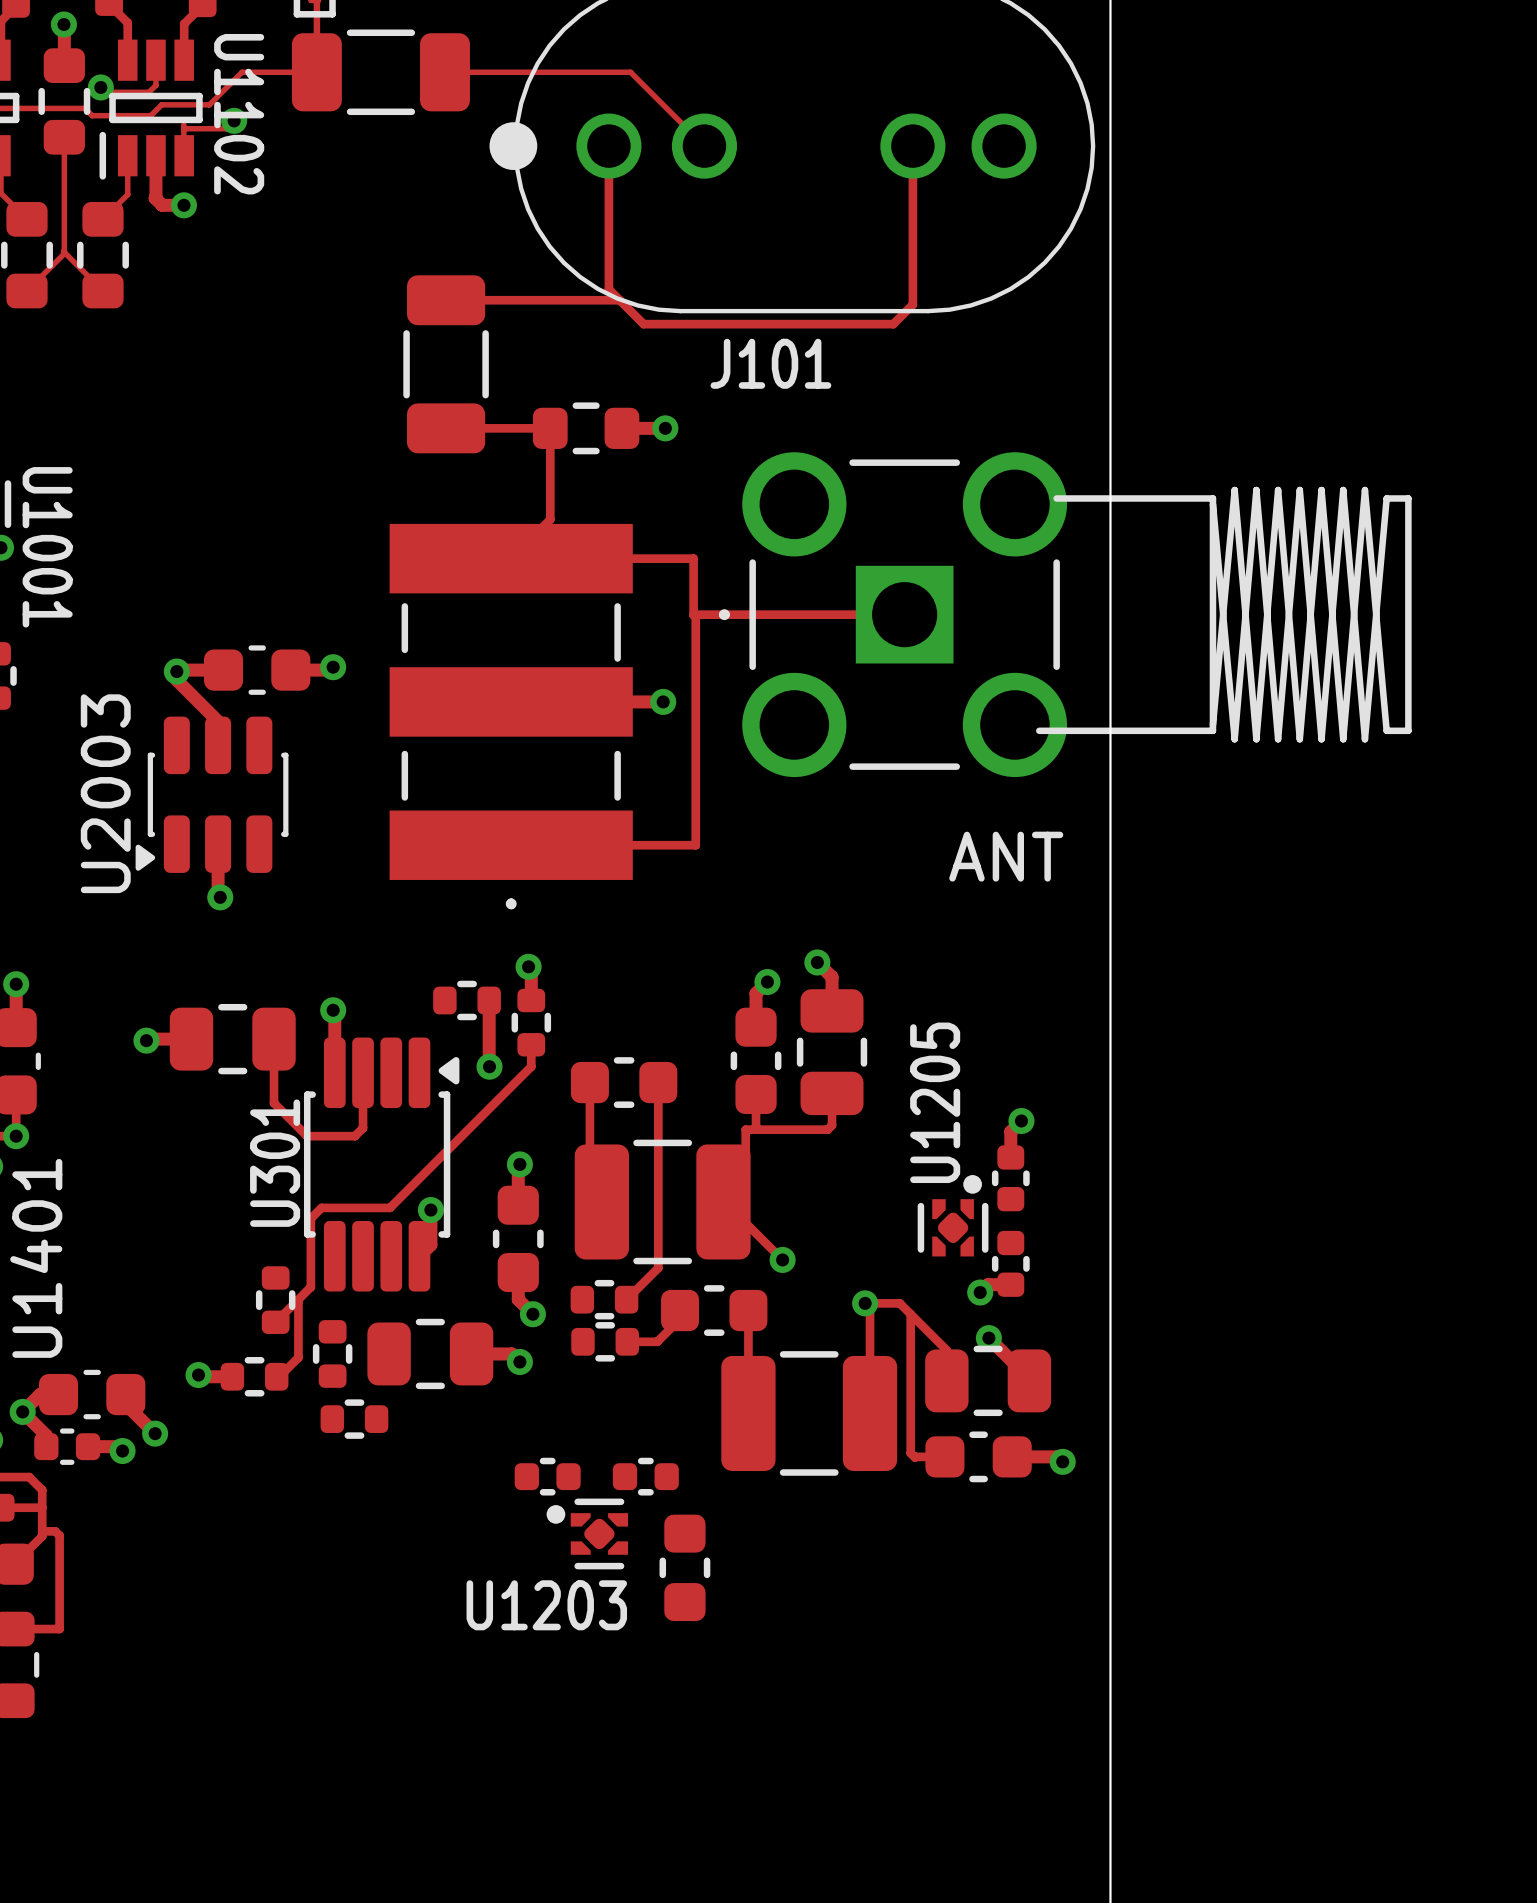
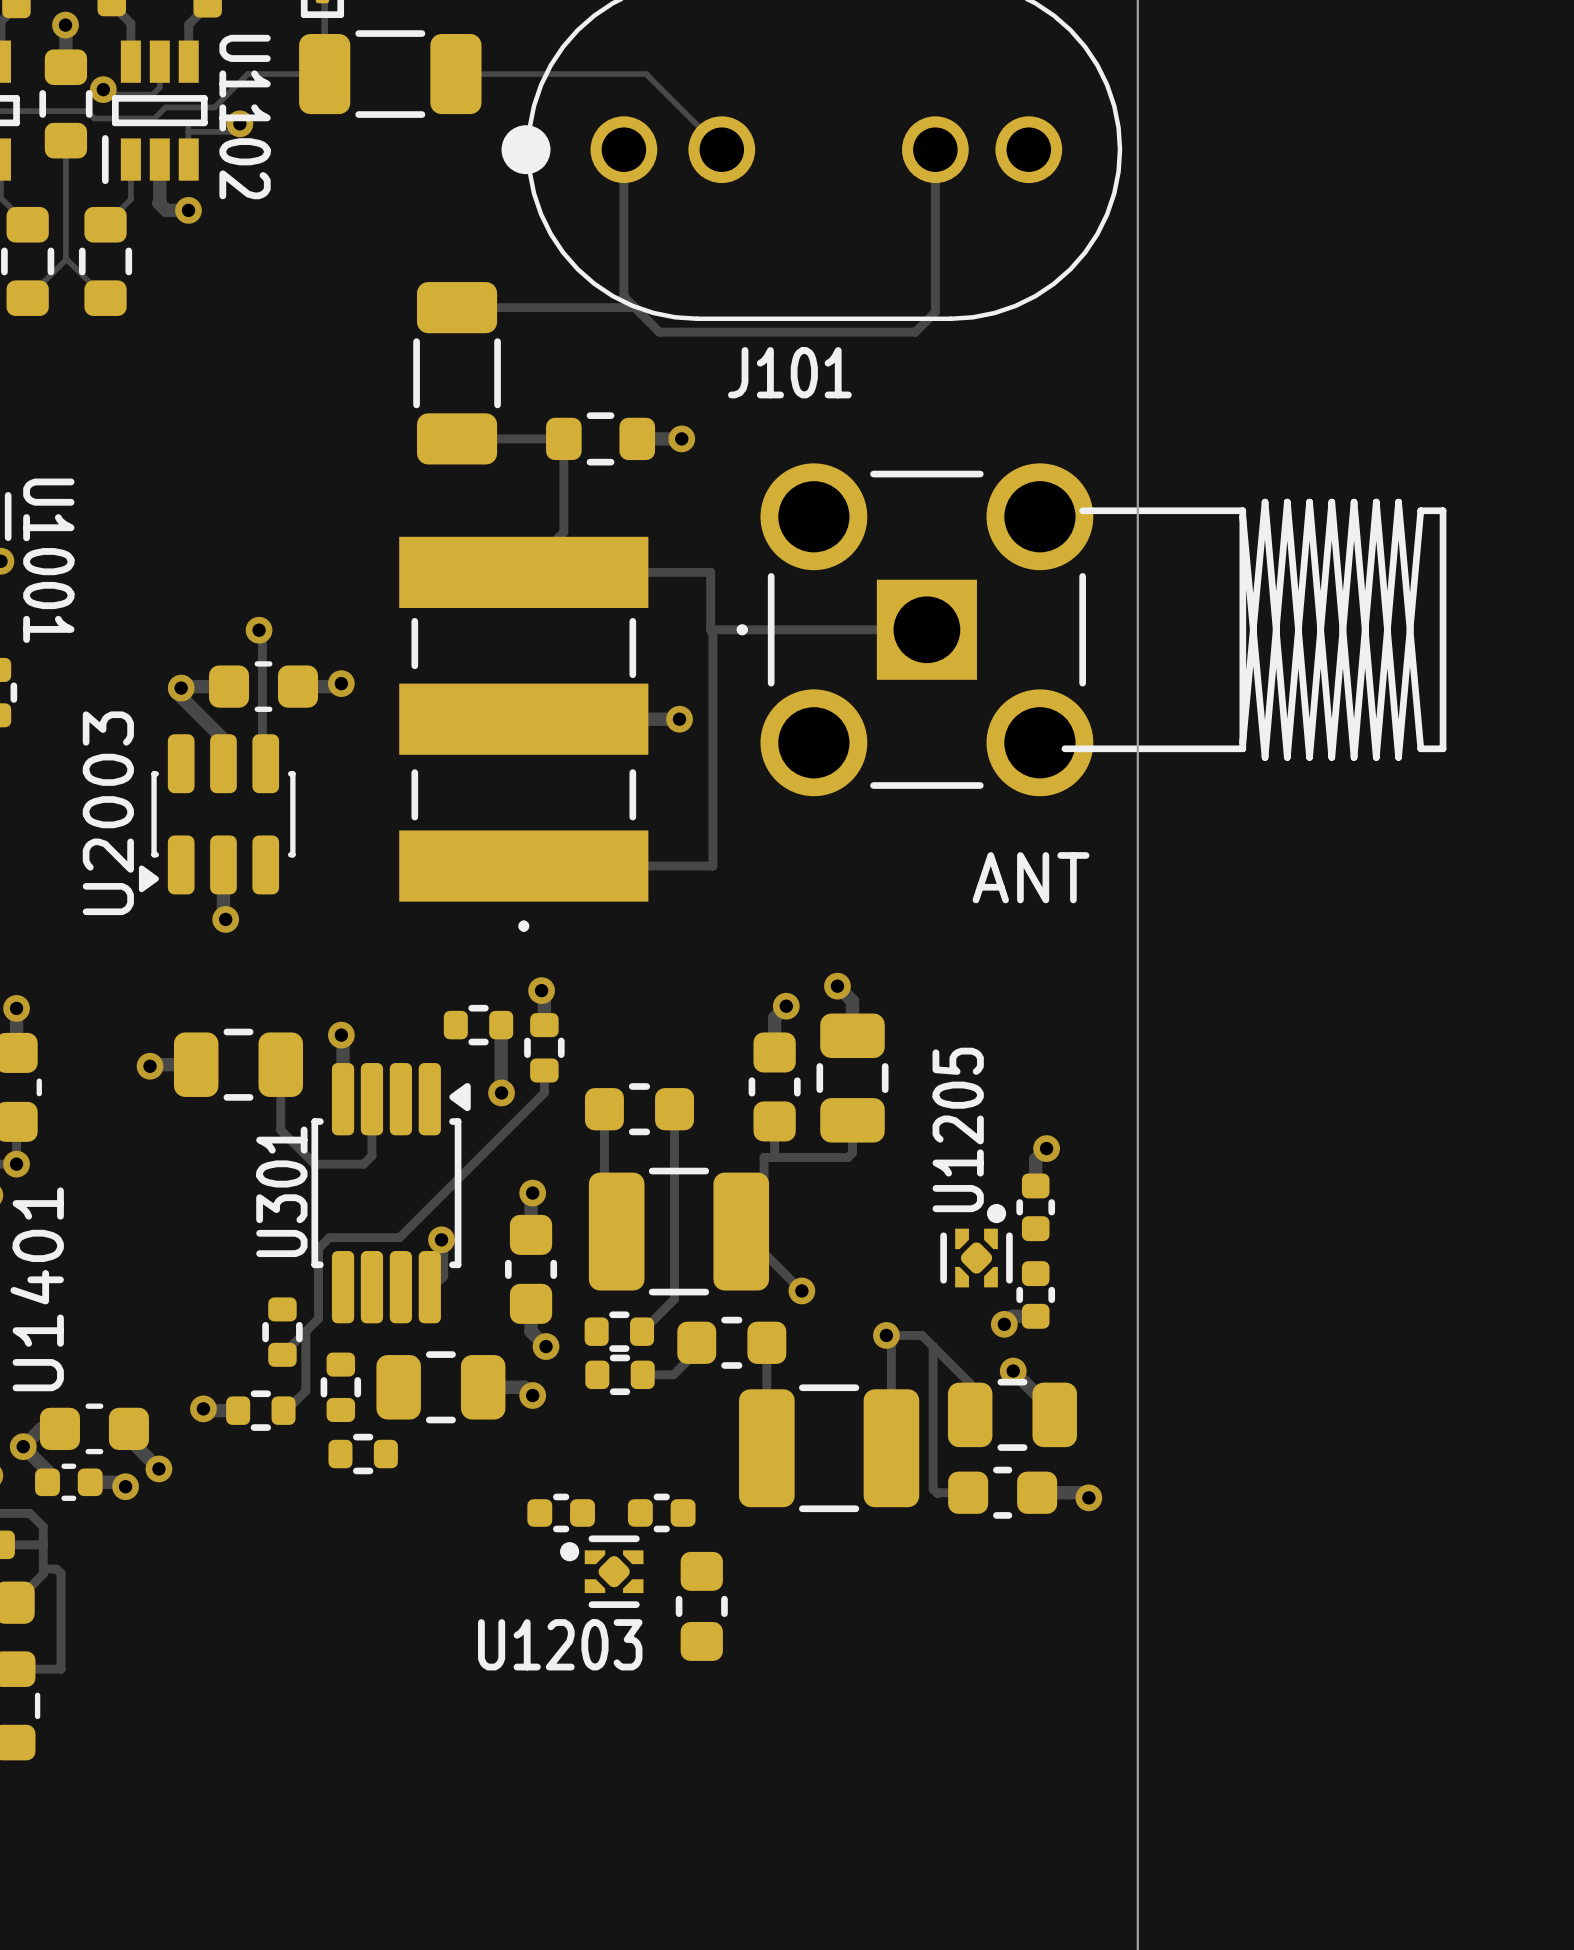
track: none -> (259, 630) (262, 633) (262, 760) (265, 763)
via: none -> (259, 630)

